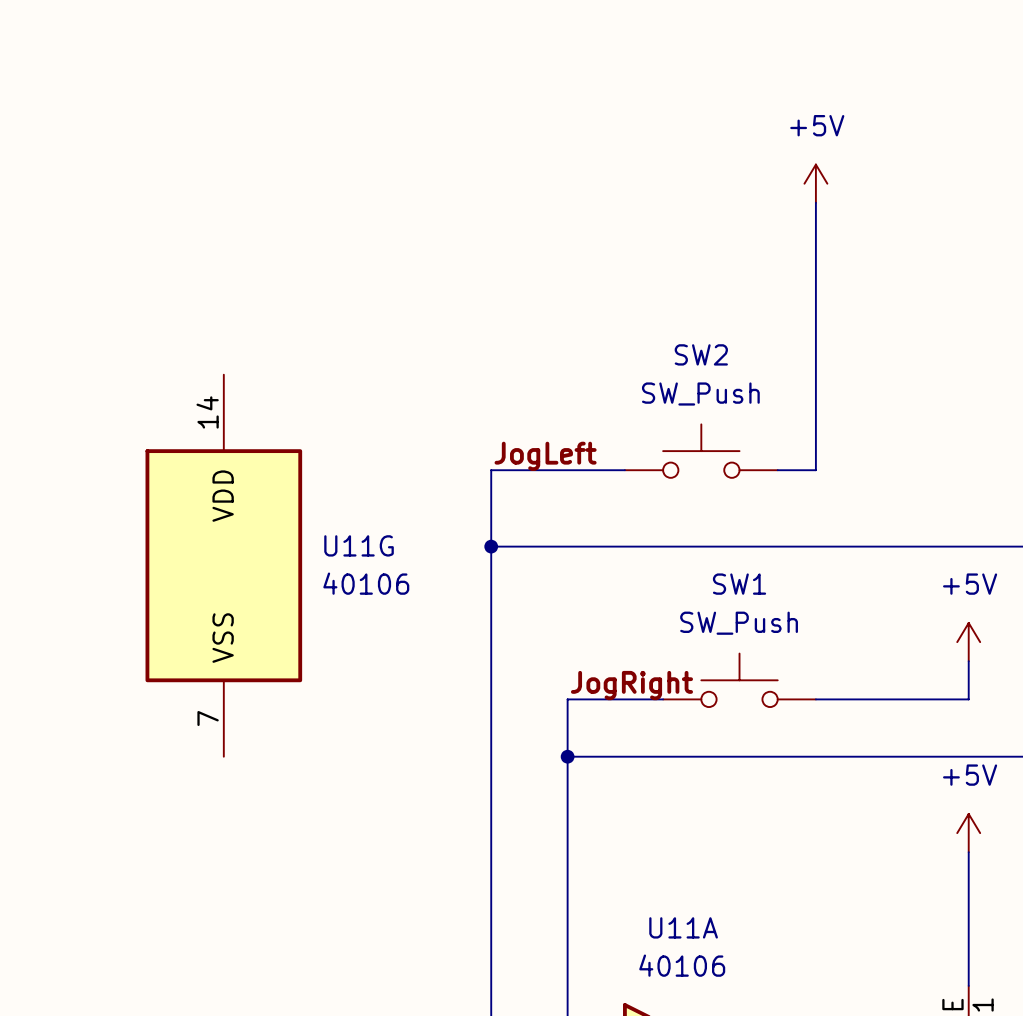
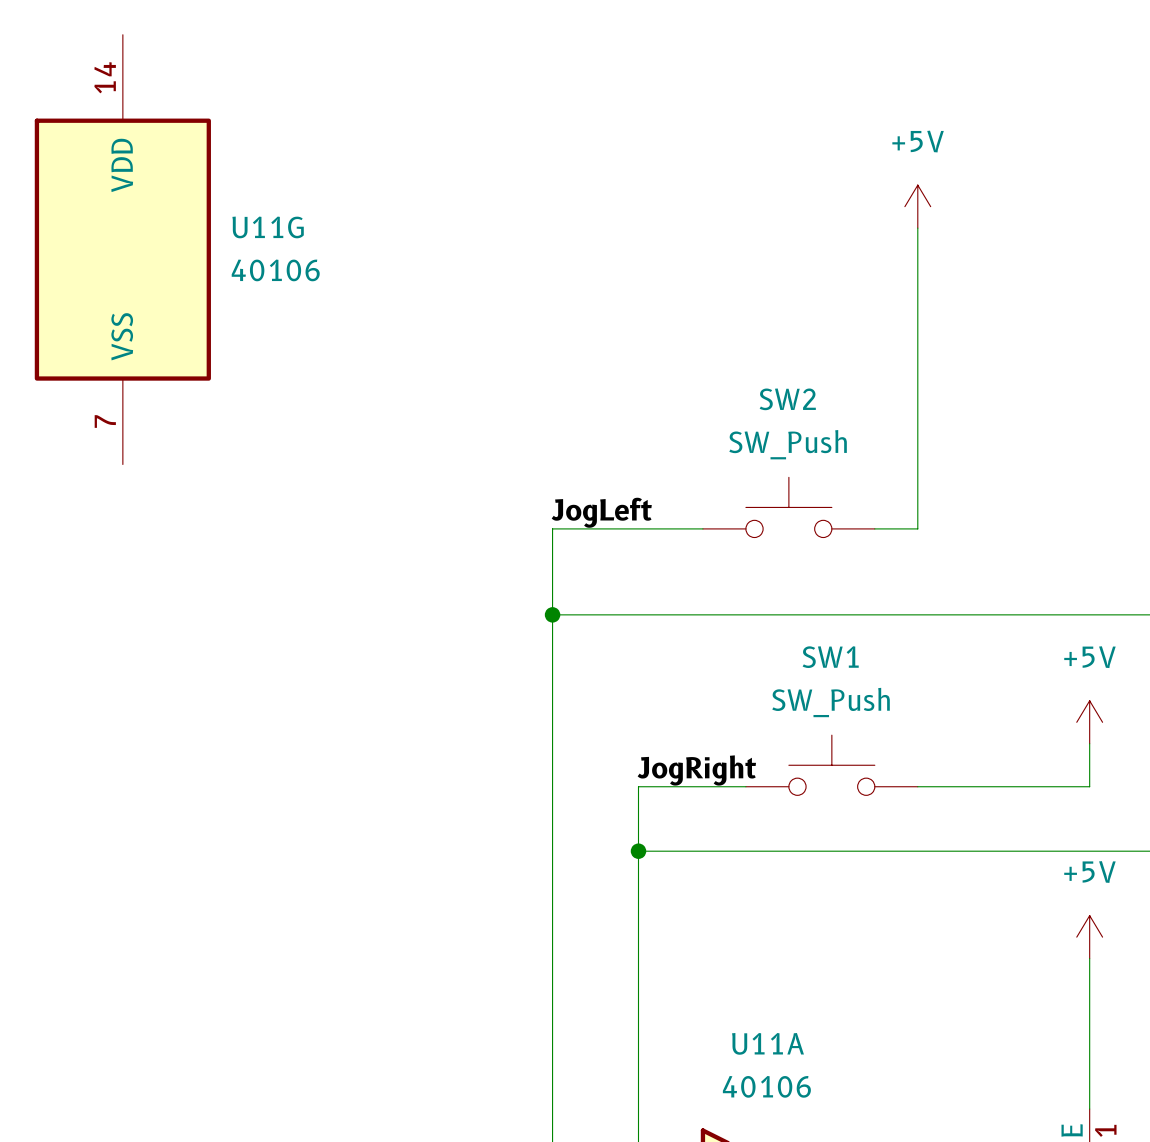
U11G position: (223, 565) -> (122, 249)

